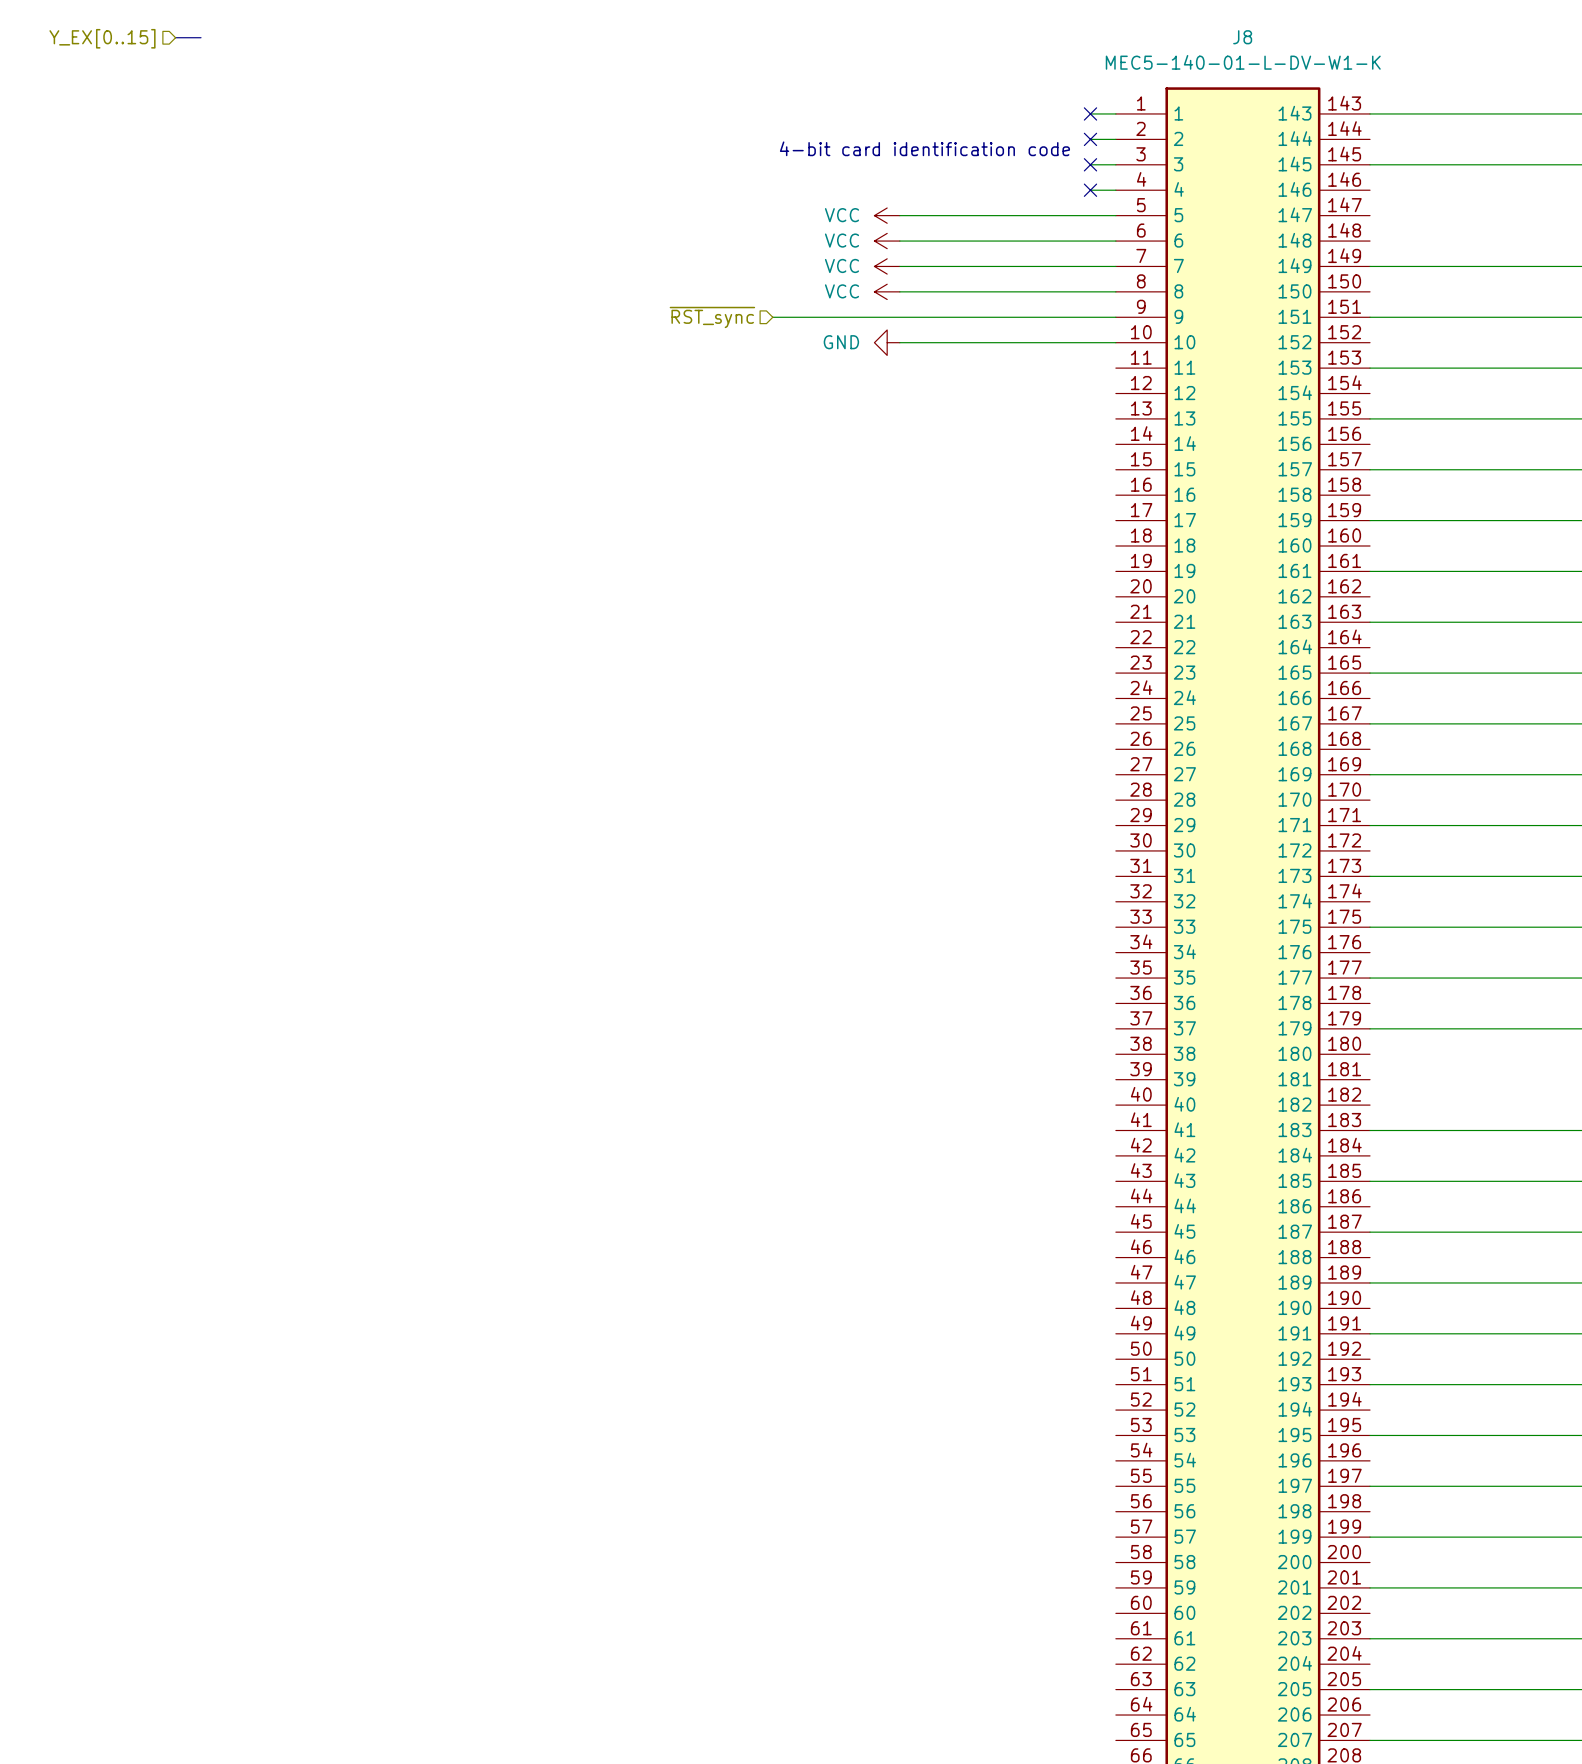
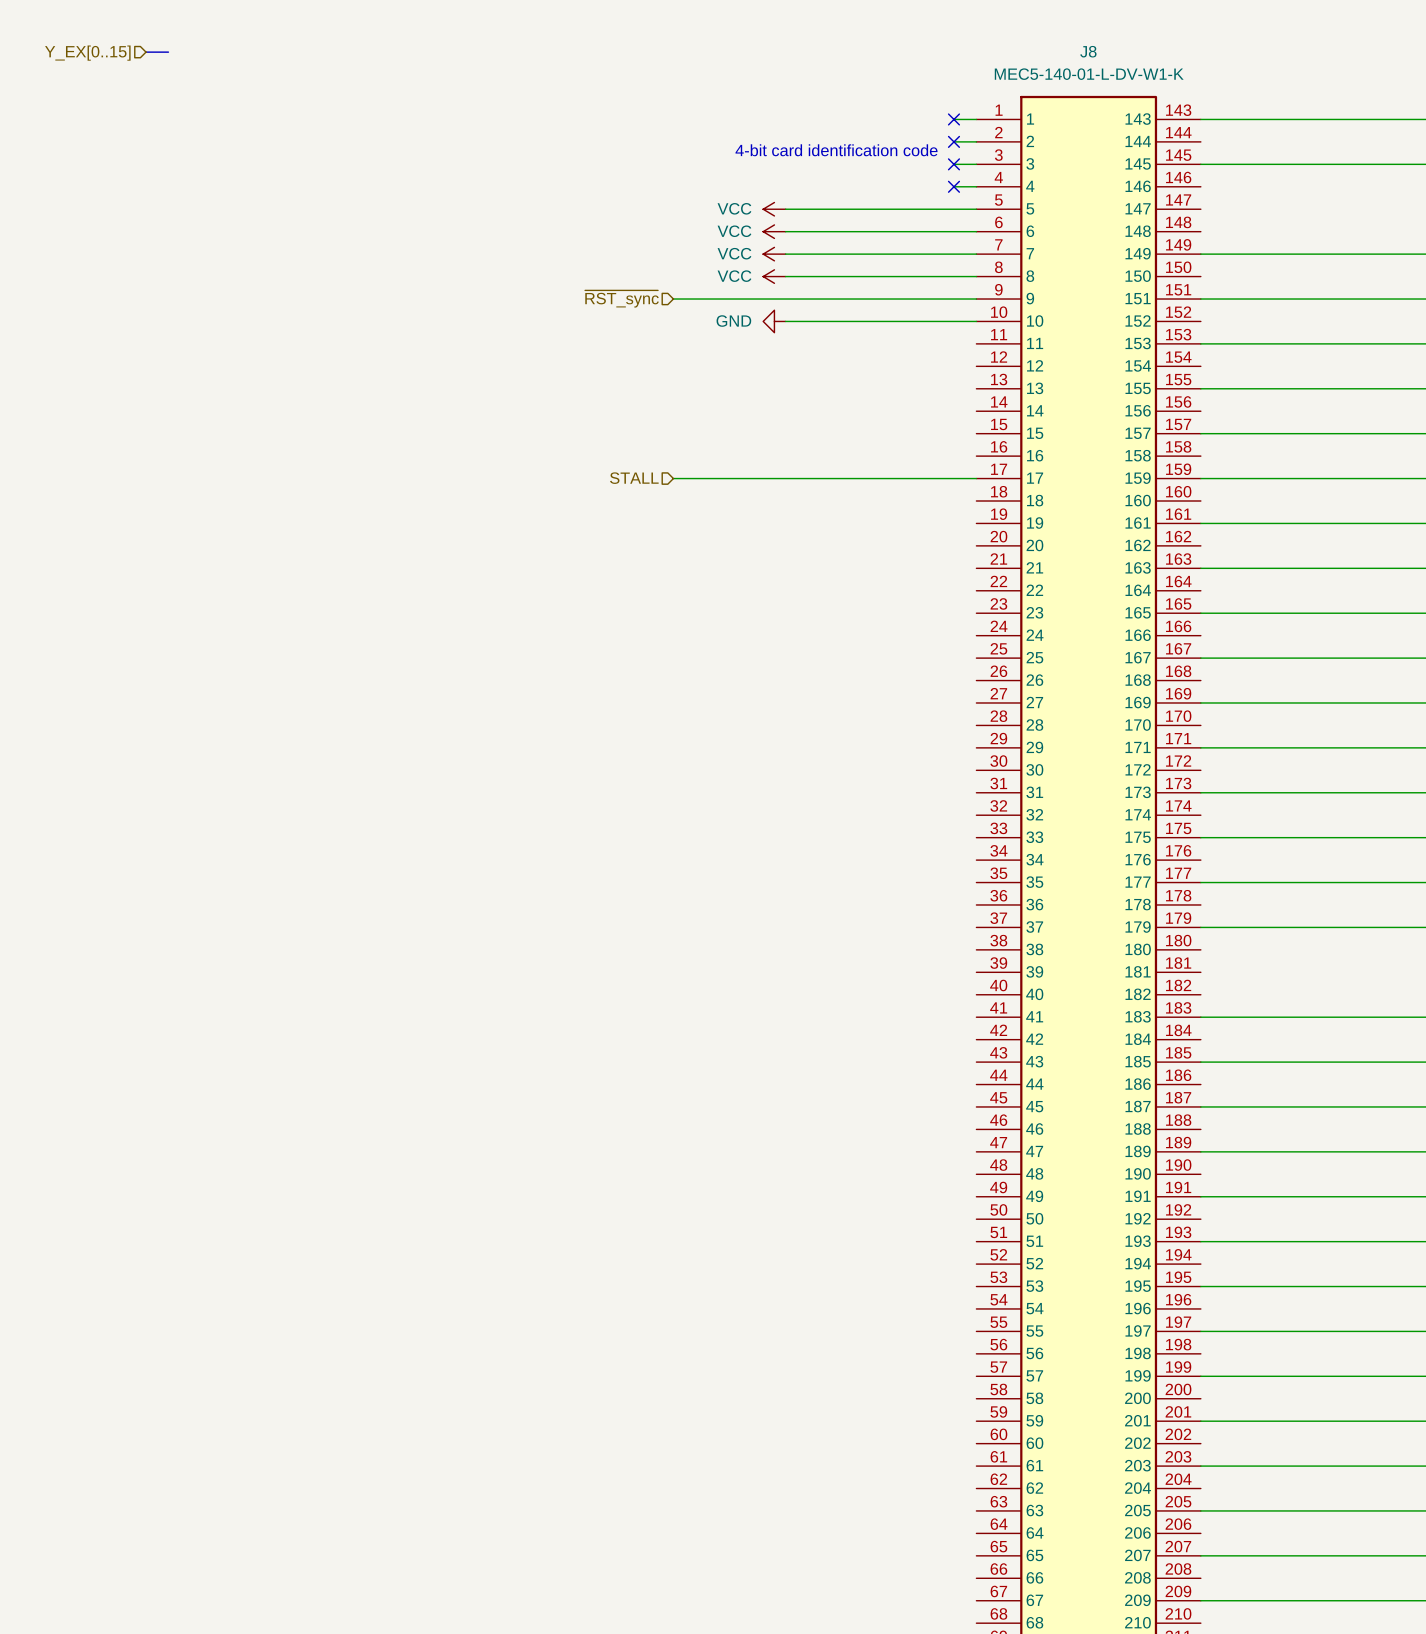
hierarchical label: none -> STALL (634, 478)
wire: none -> (673, 478) (976, 478)

